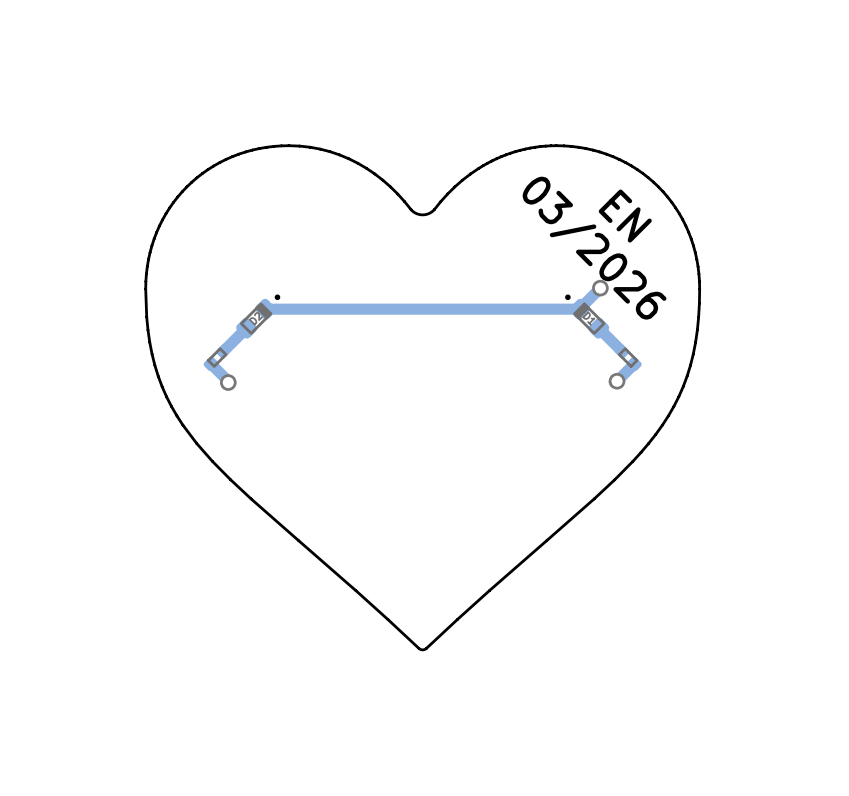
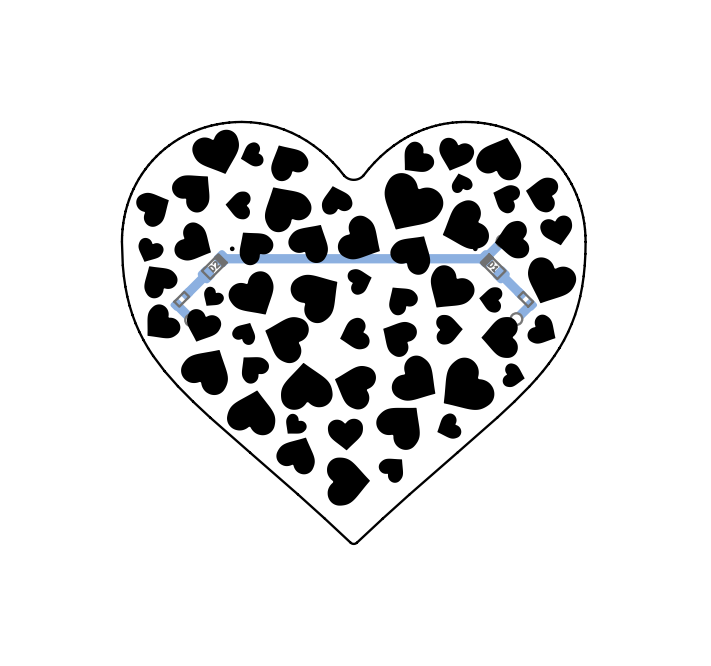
drawing: none -> [136, 129, 577, 506]
text: EN (625, 216) -> none
text: 03/2026 (594, 248) -> none

